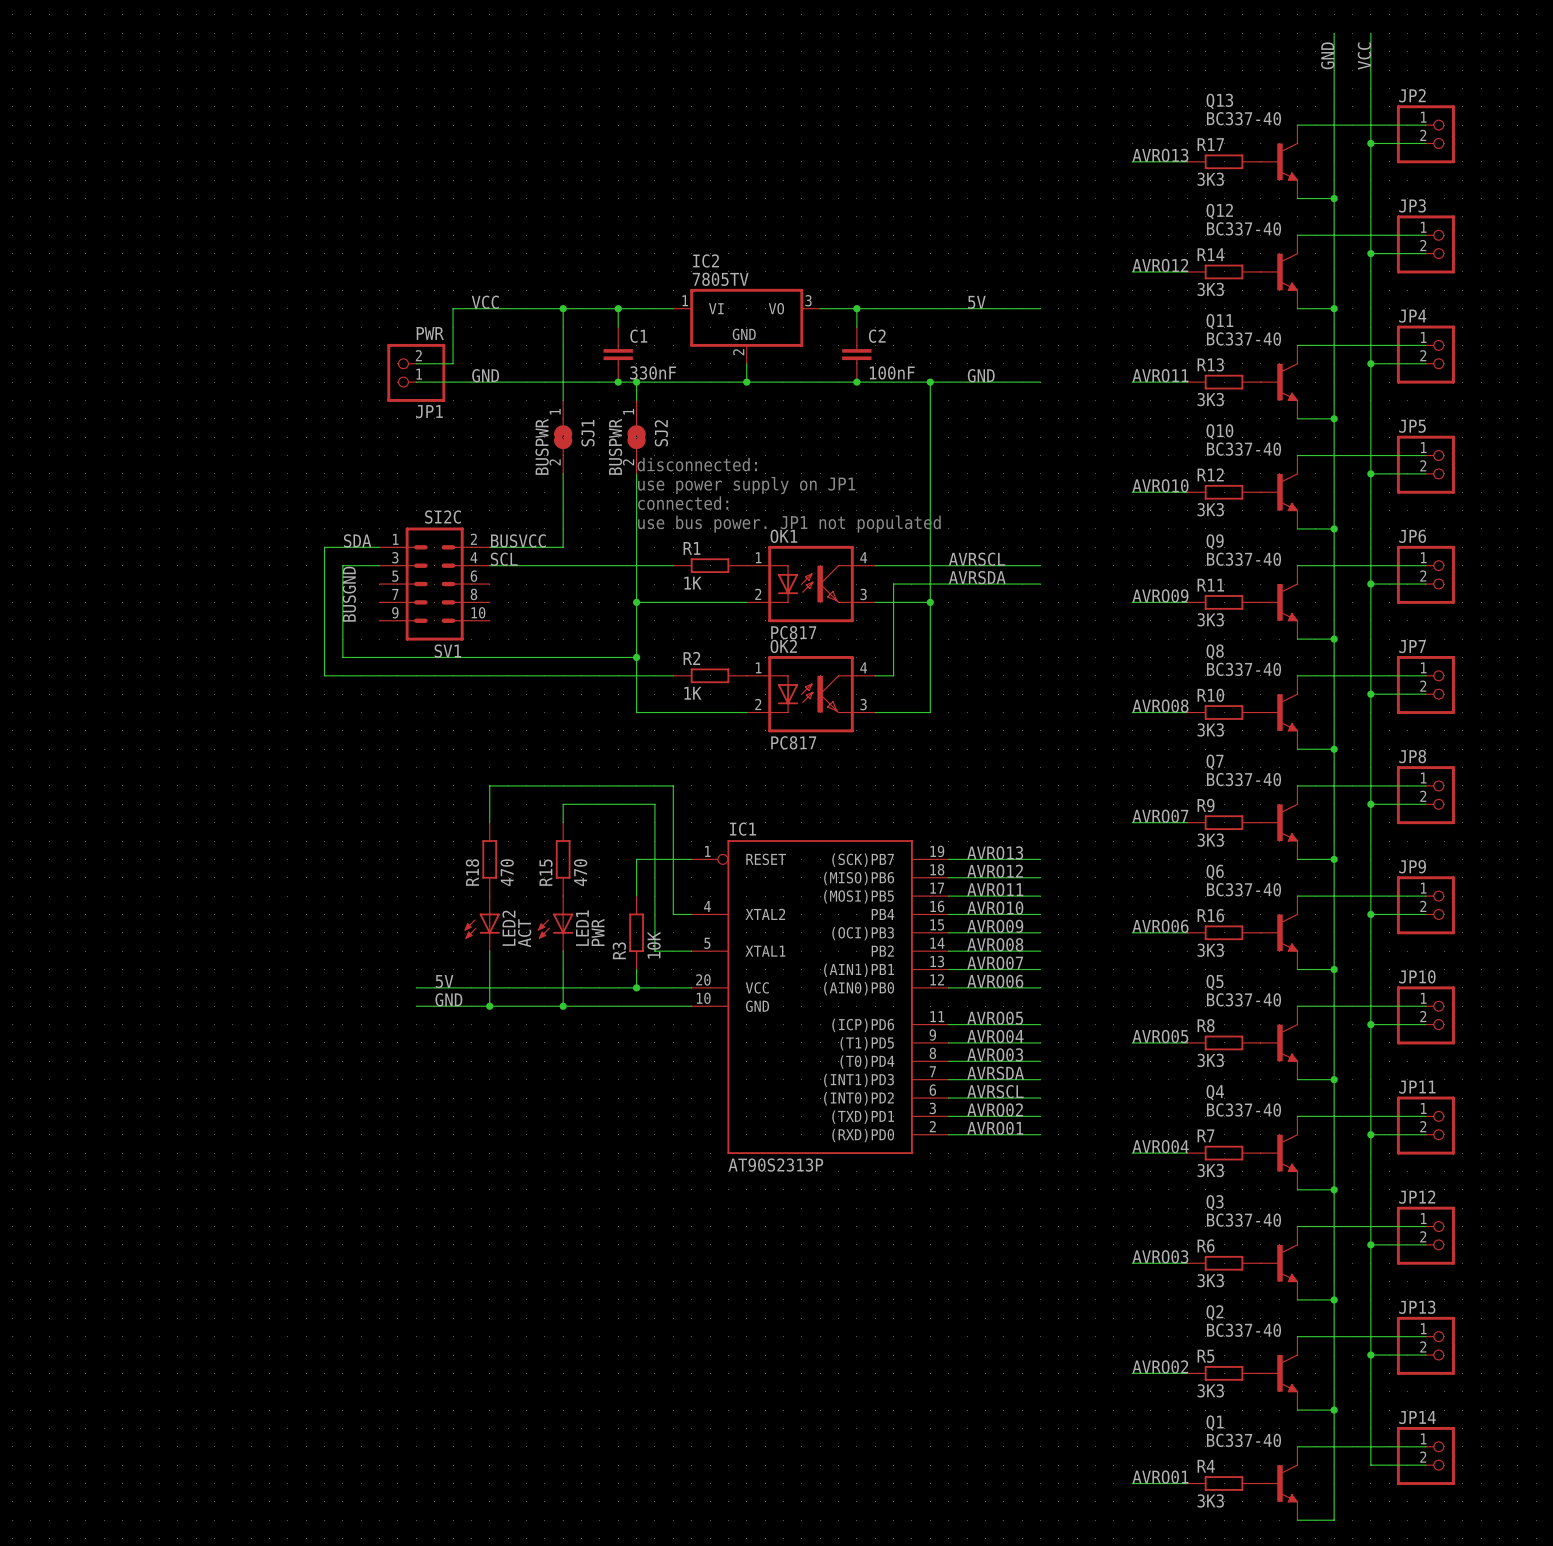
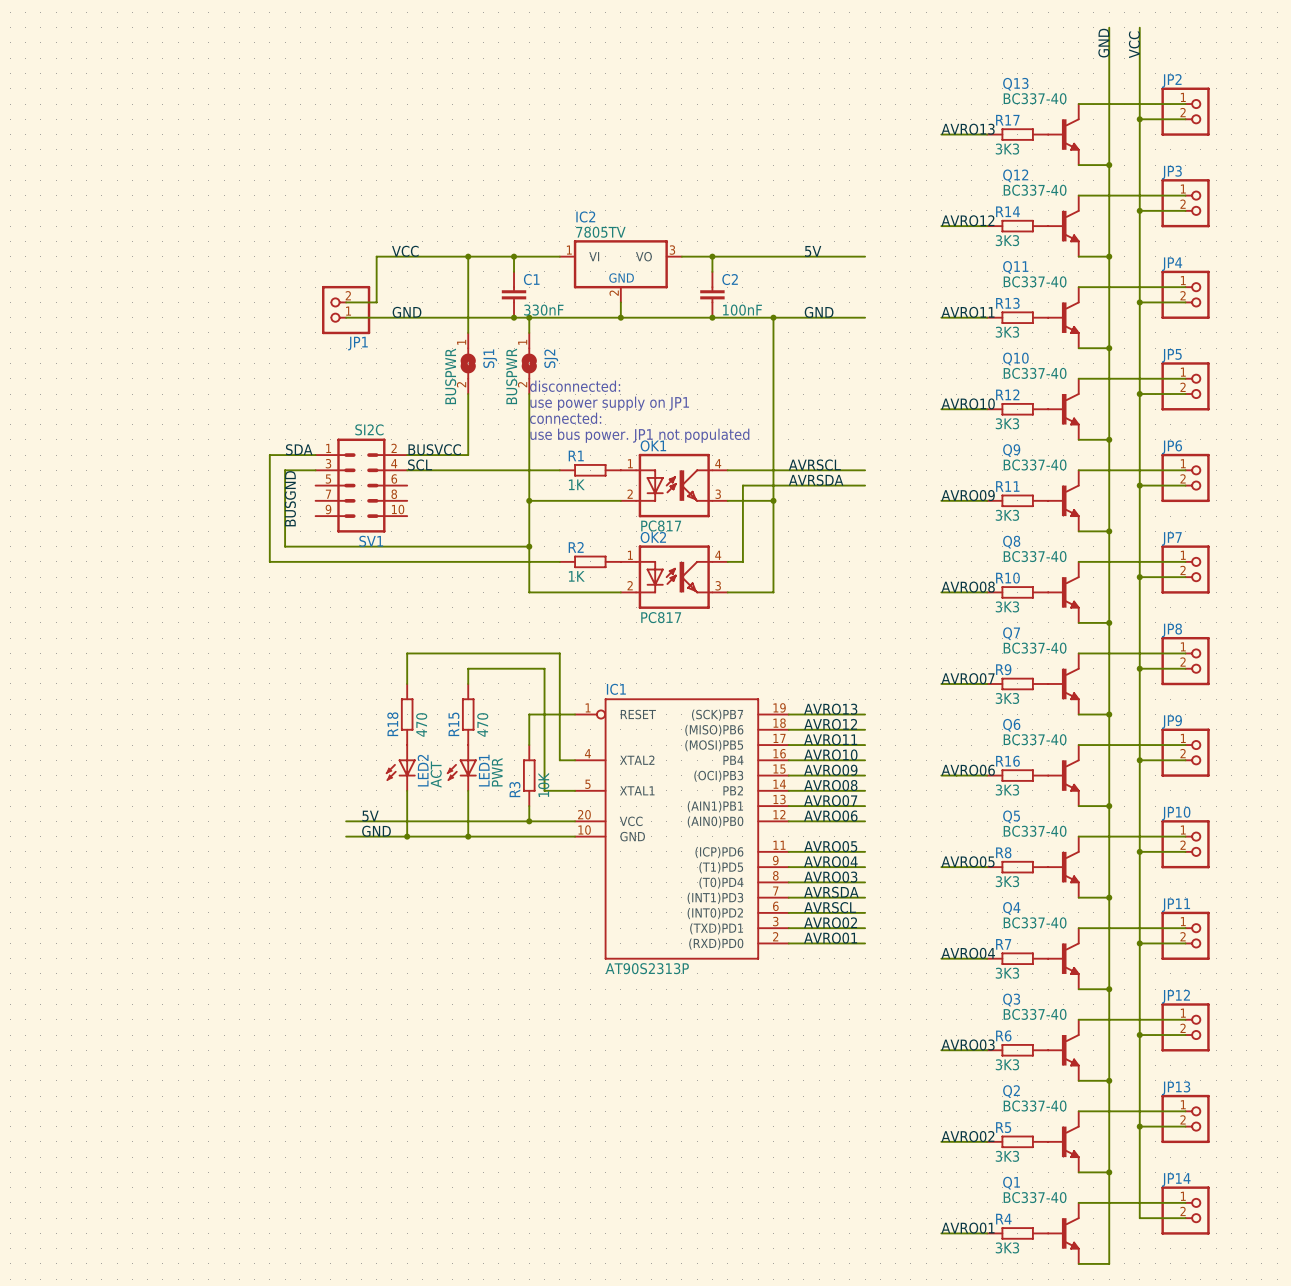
JP1 value: PWR (430, 333) -> none

